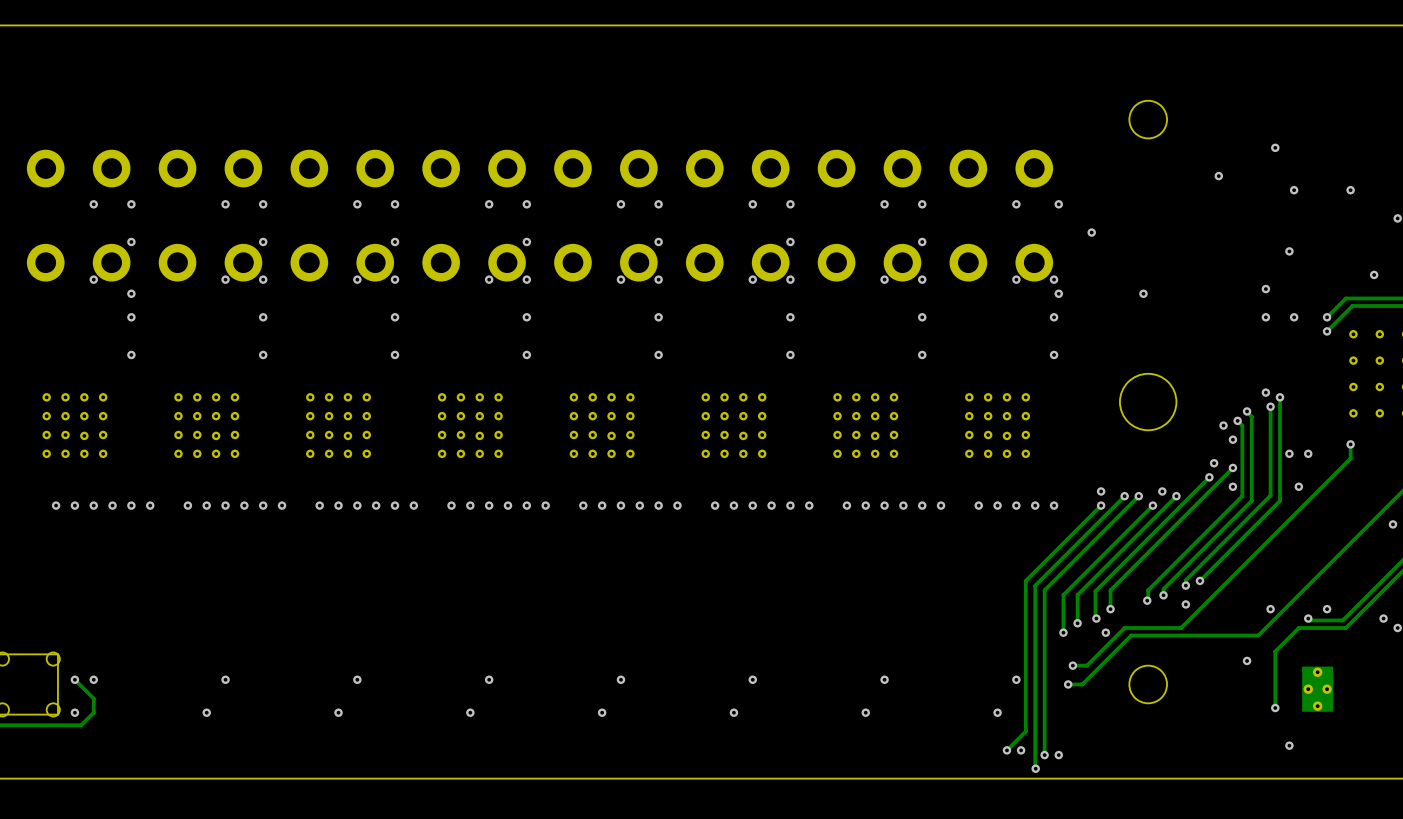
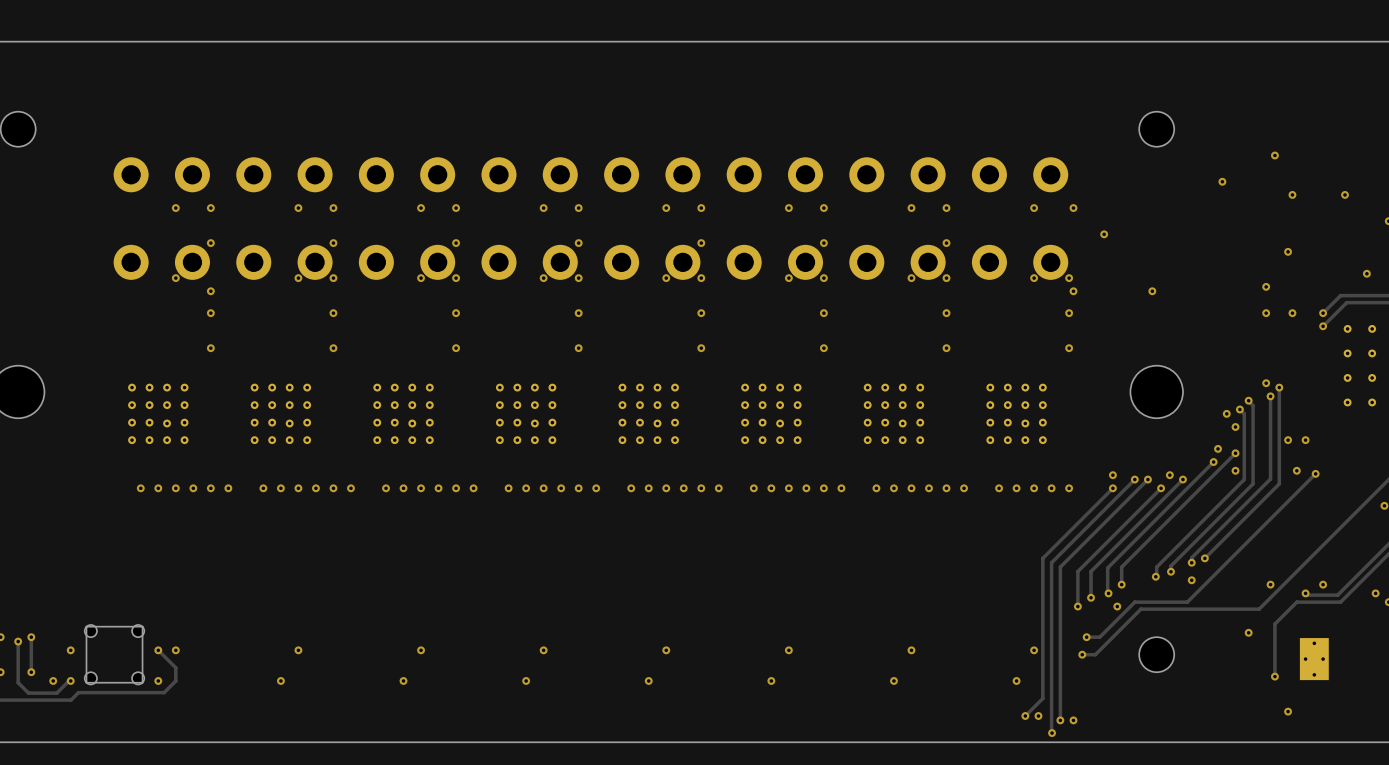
track: (1350, 444) (1350, 458) (1319, 490) -> none
via position: (1350, 444) -> (1315, 473)

